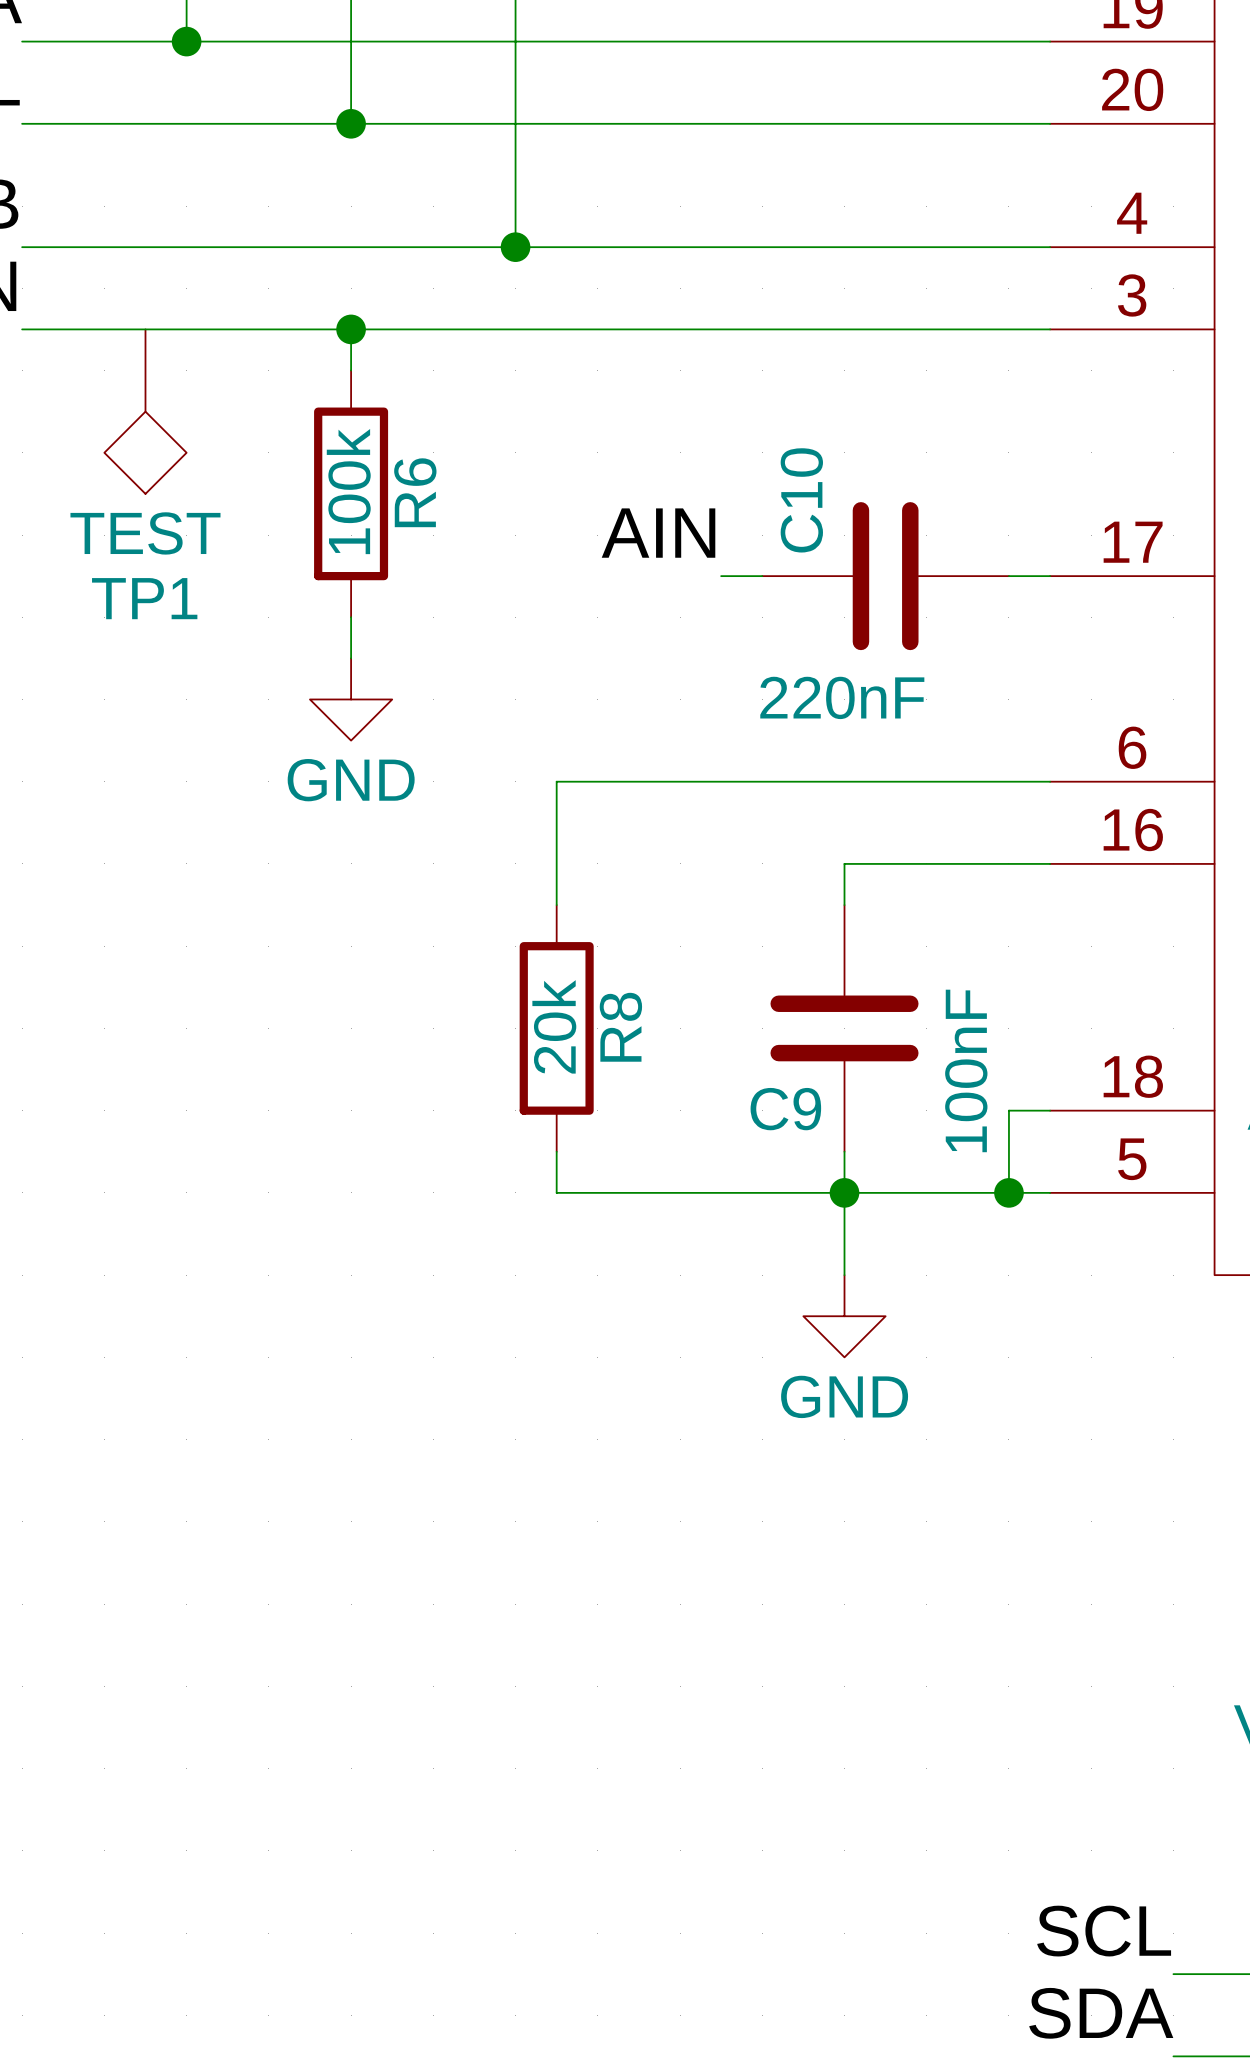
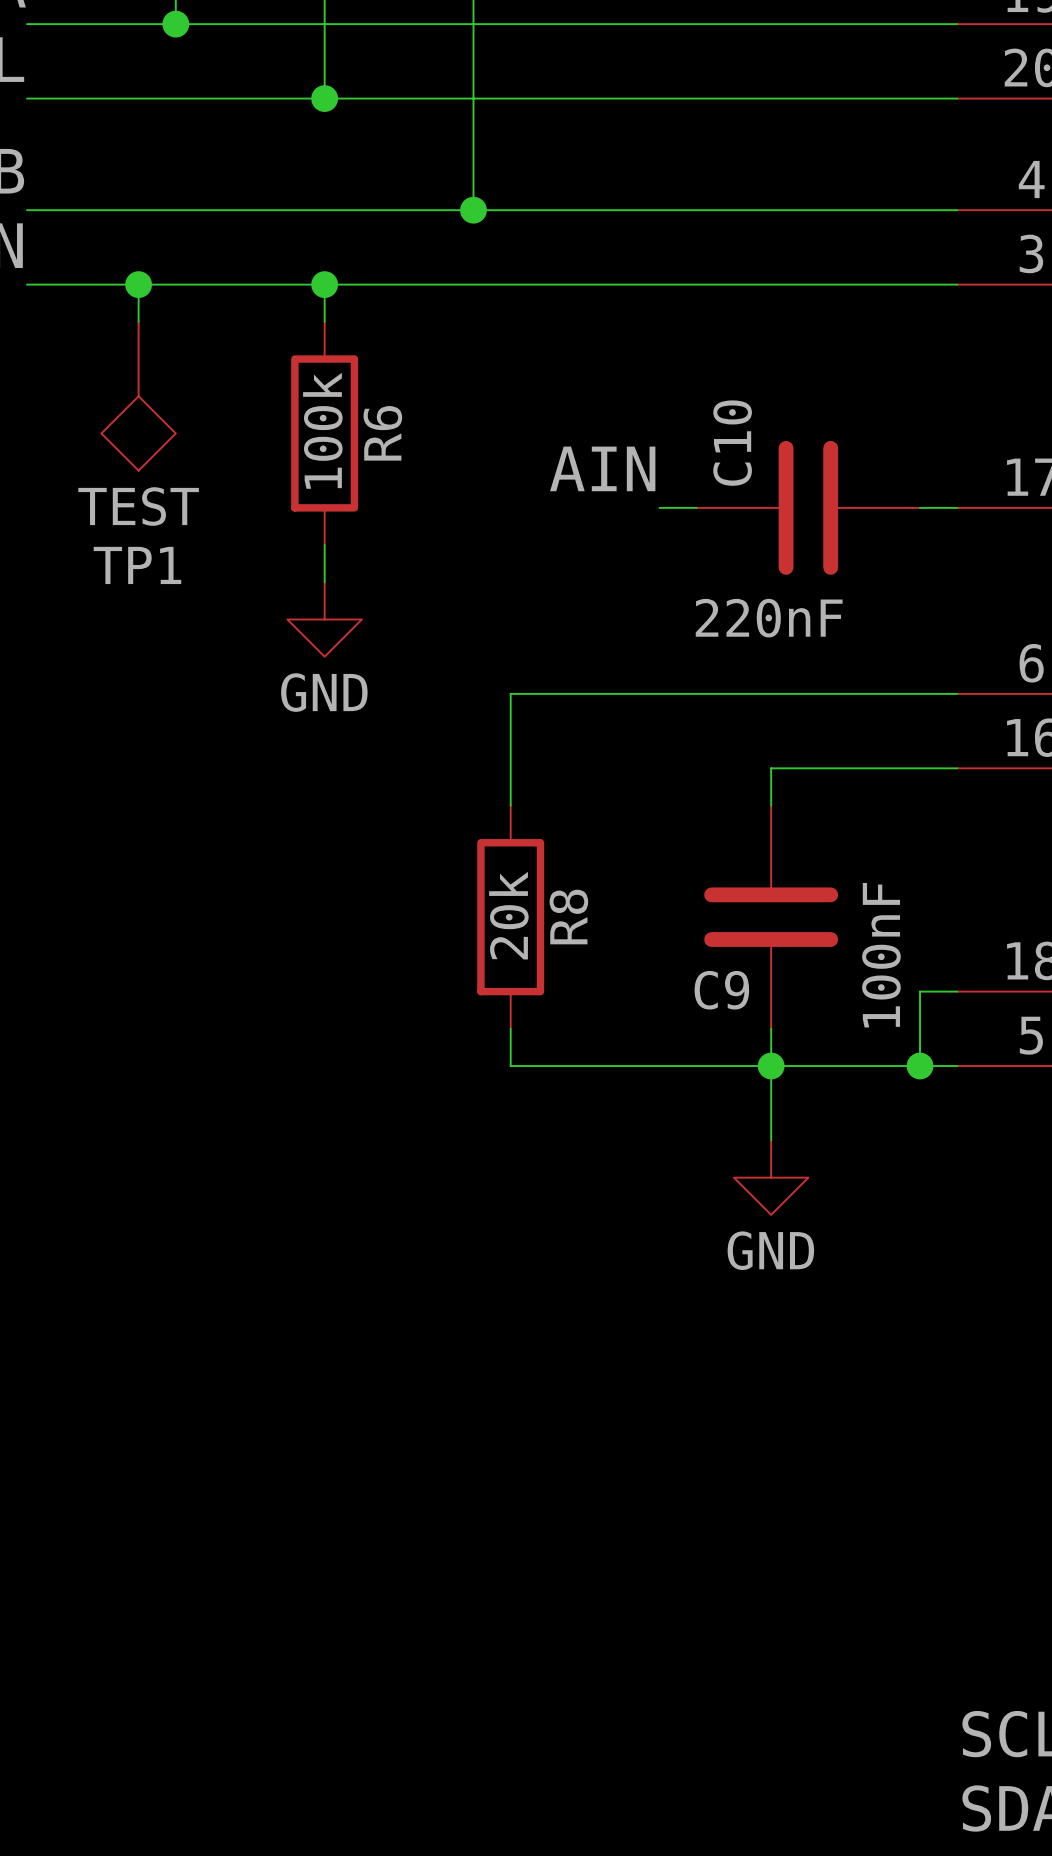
junction: none -> (138, 284)
TP1 position: (145, 411) -> (138, 396)

